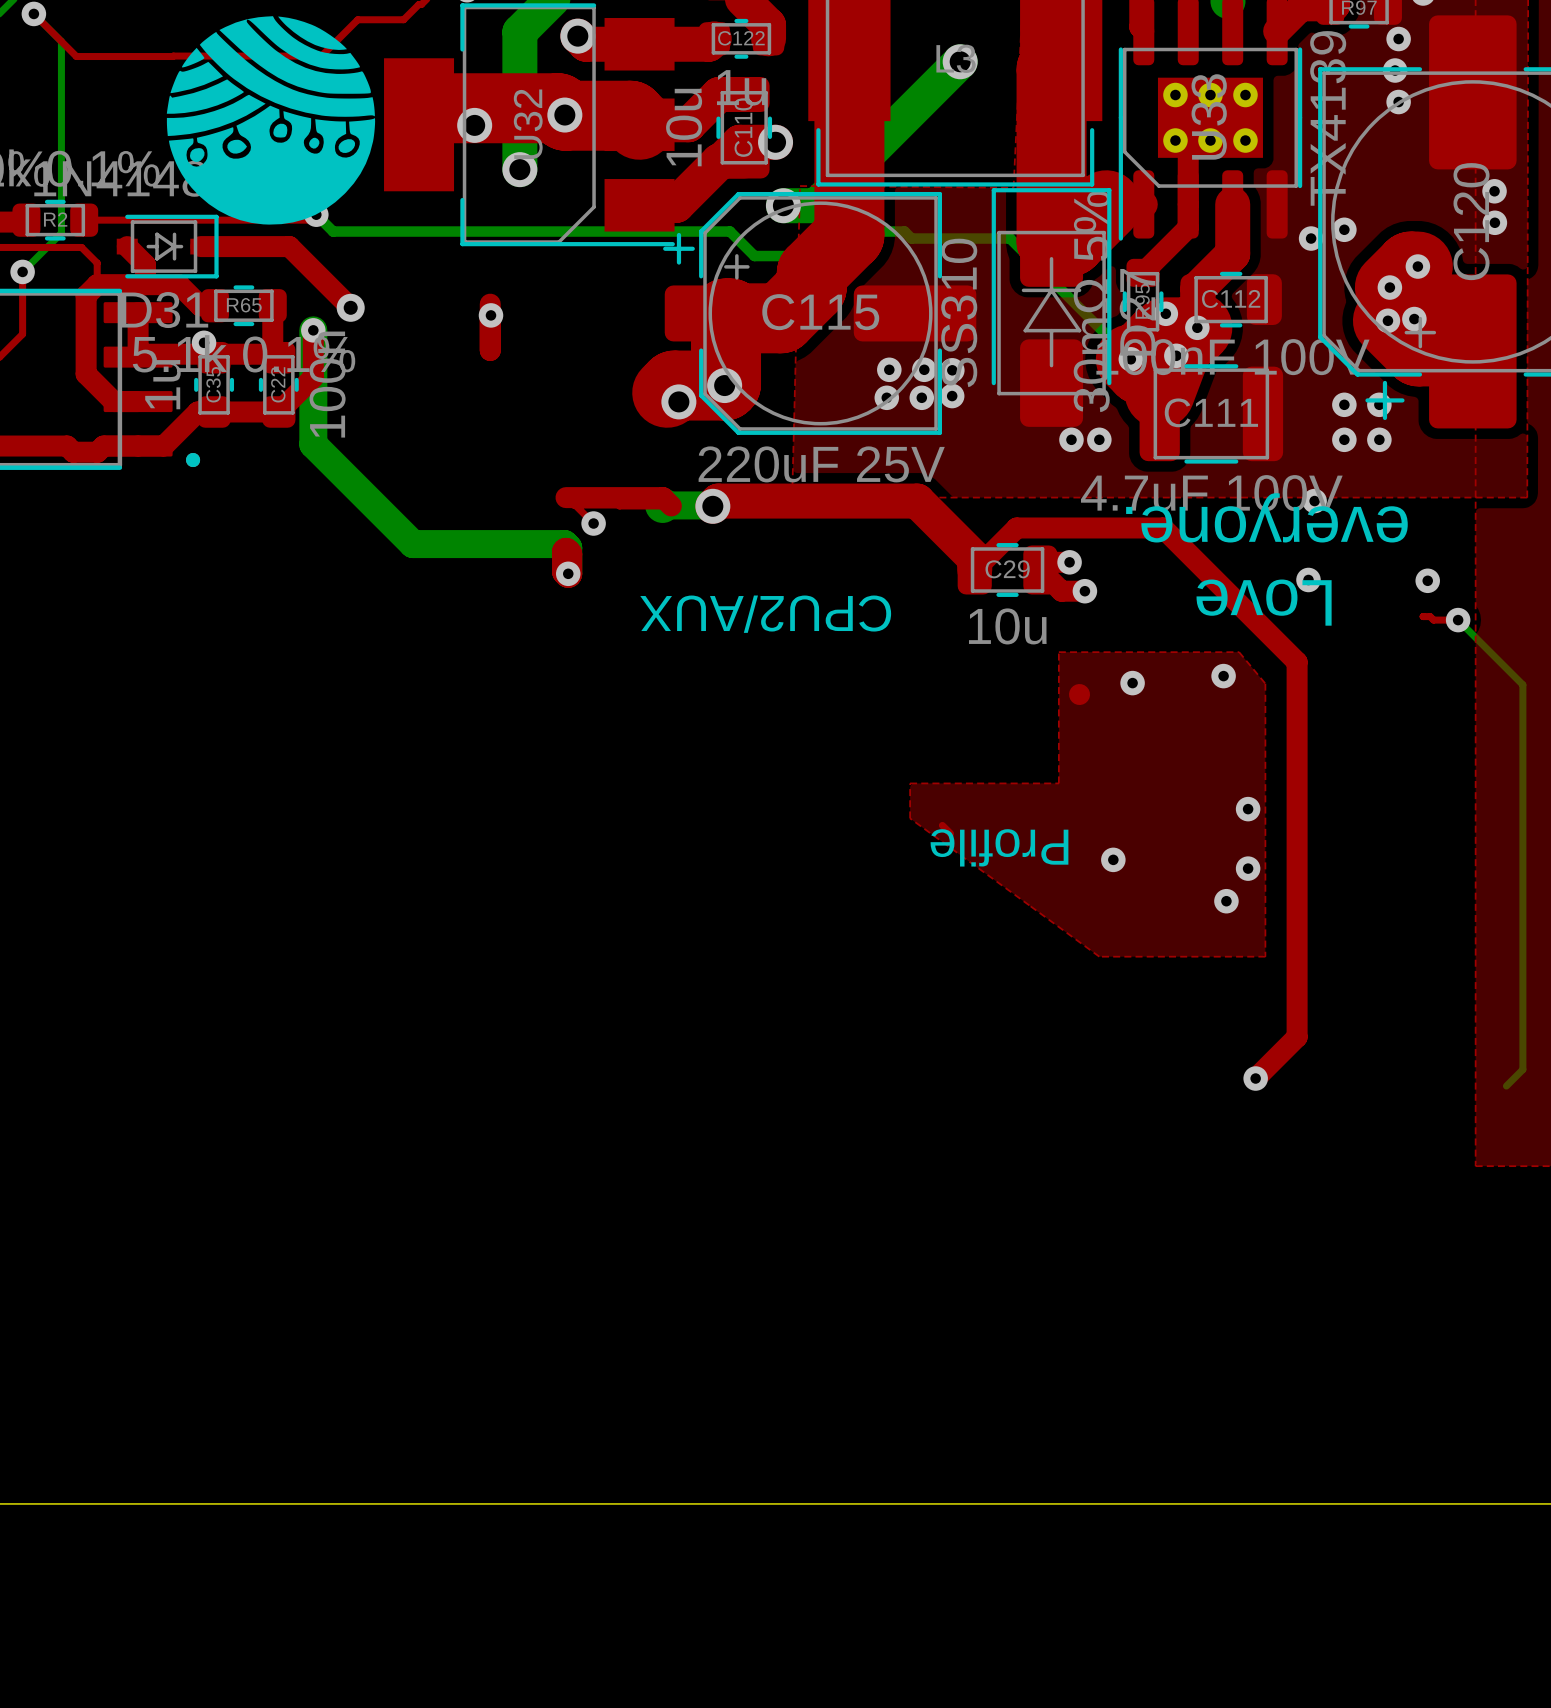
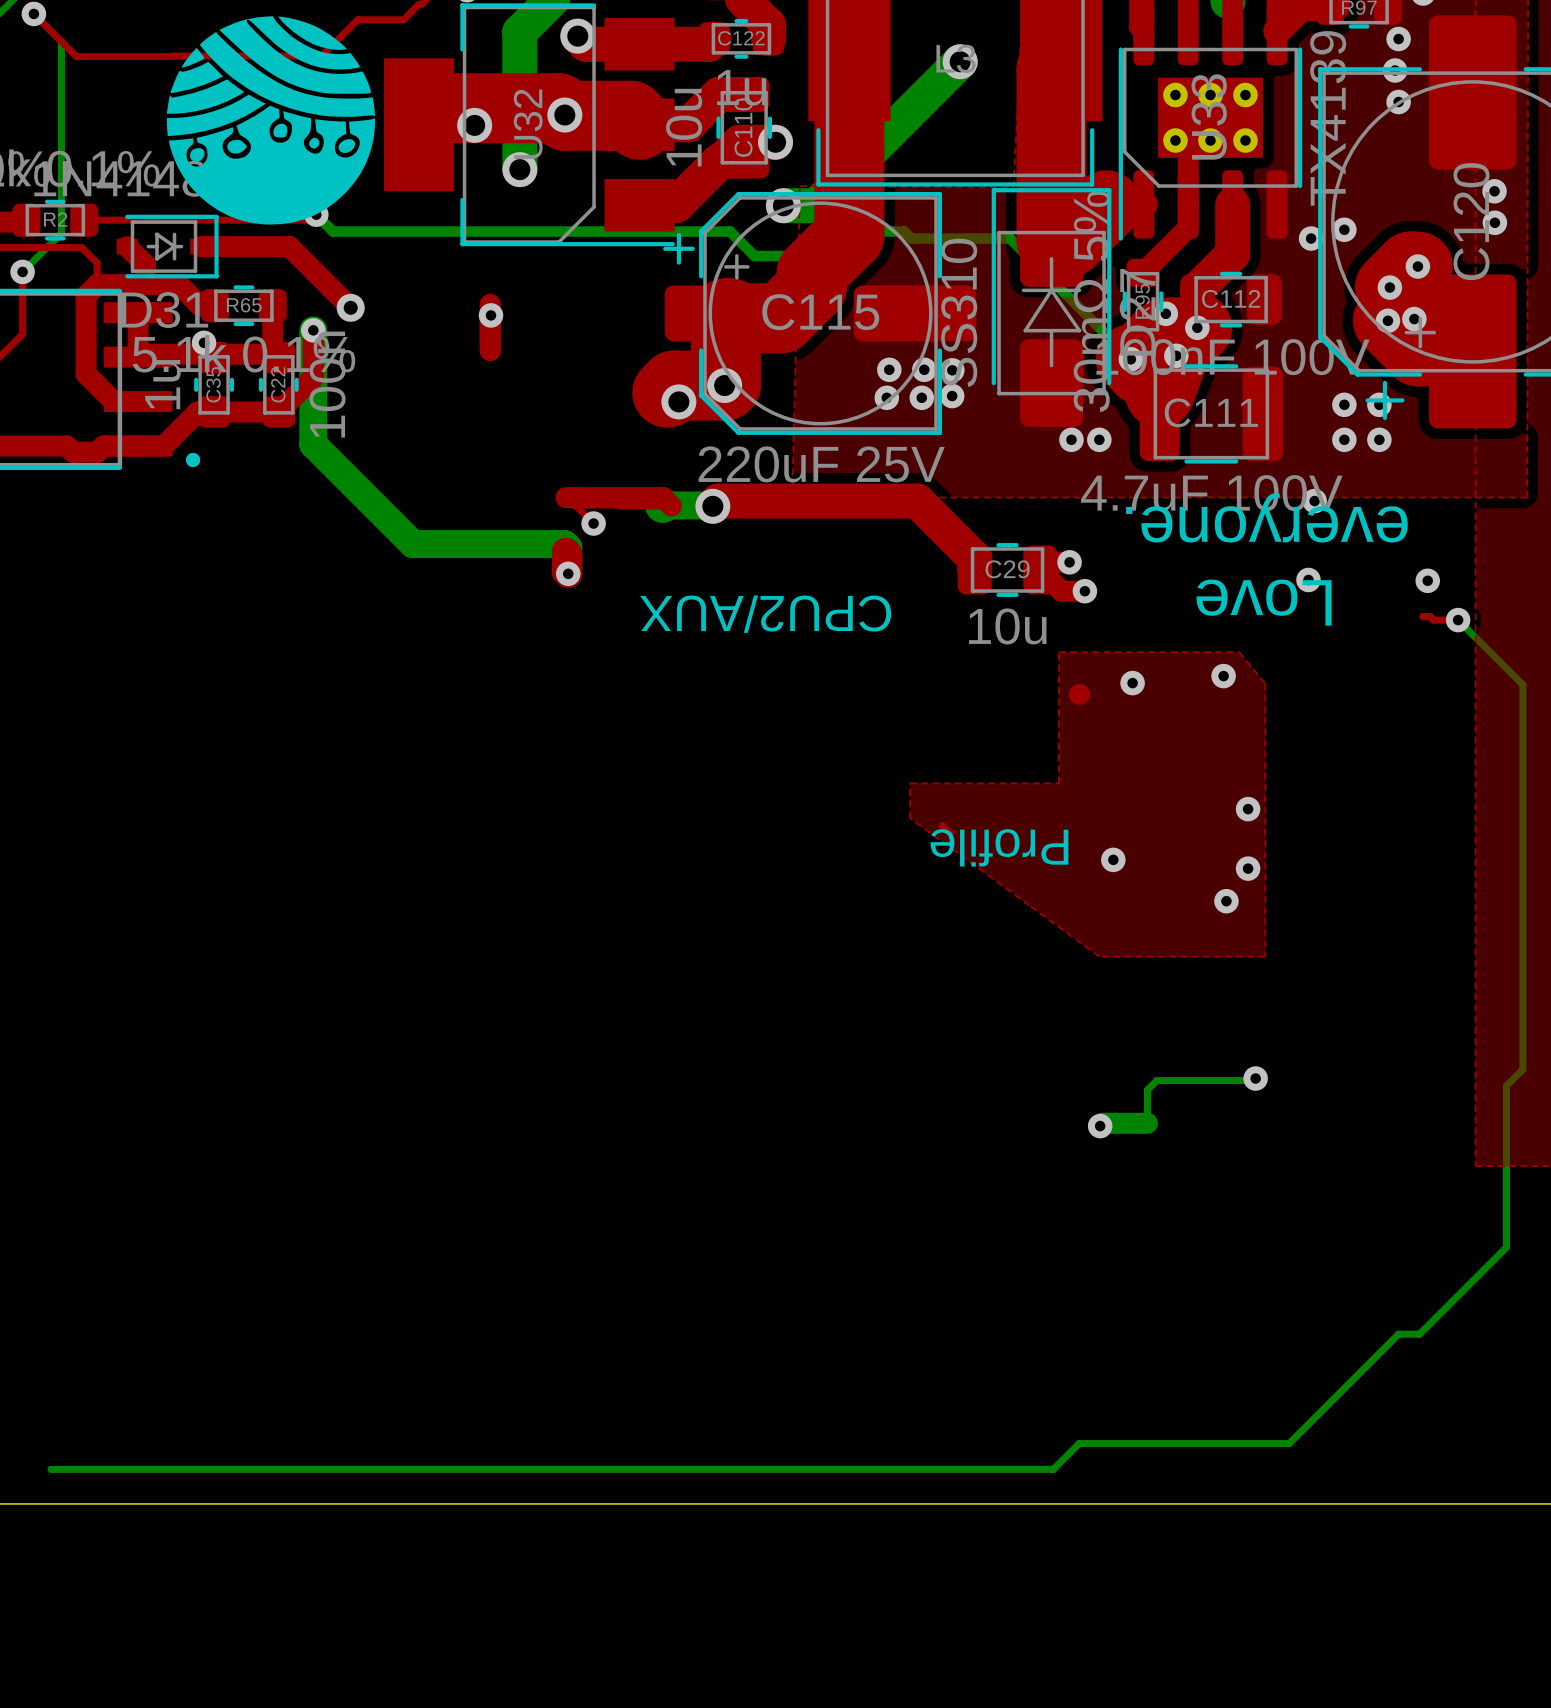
top track: (974, 569) (1016, 527) (1163, 527) (1297, 662) (1297, 1037) (1255, 1078) -> none
bottom track: none -> (1253, 1080) (1156, 1080) (1147, 1090) (1147, 1123) (1102, 1123) (1100, 1126)
bottom track: none -> (1506, 1086) (1506, 1247) (1419, 1334) (1398, 1334) (1289, 1443) (1079, 1443) (1053, 1469) (50, 1469)
via: none -> (1100, 1126)

